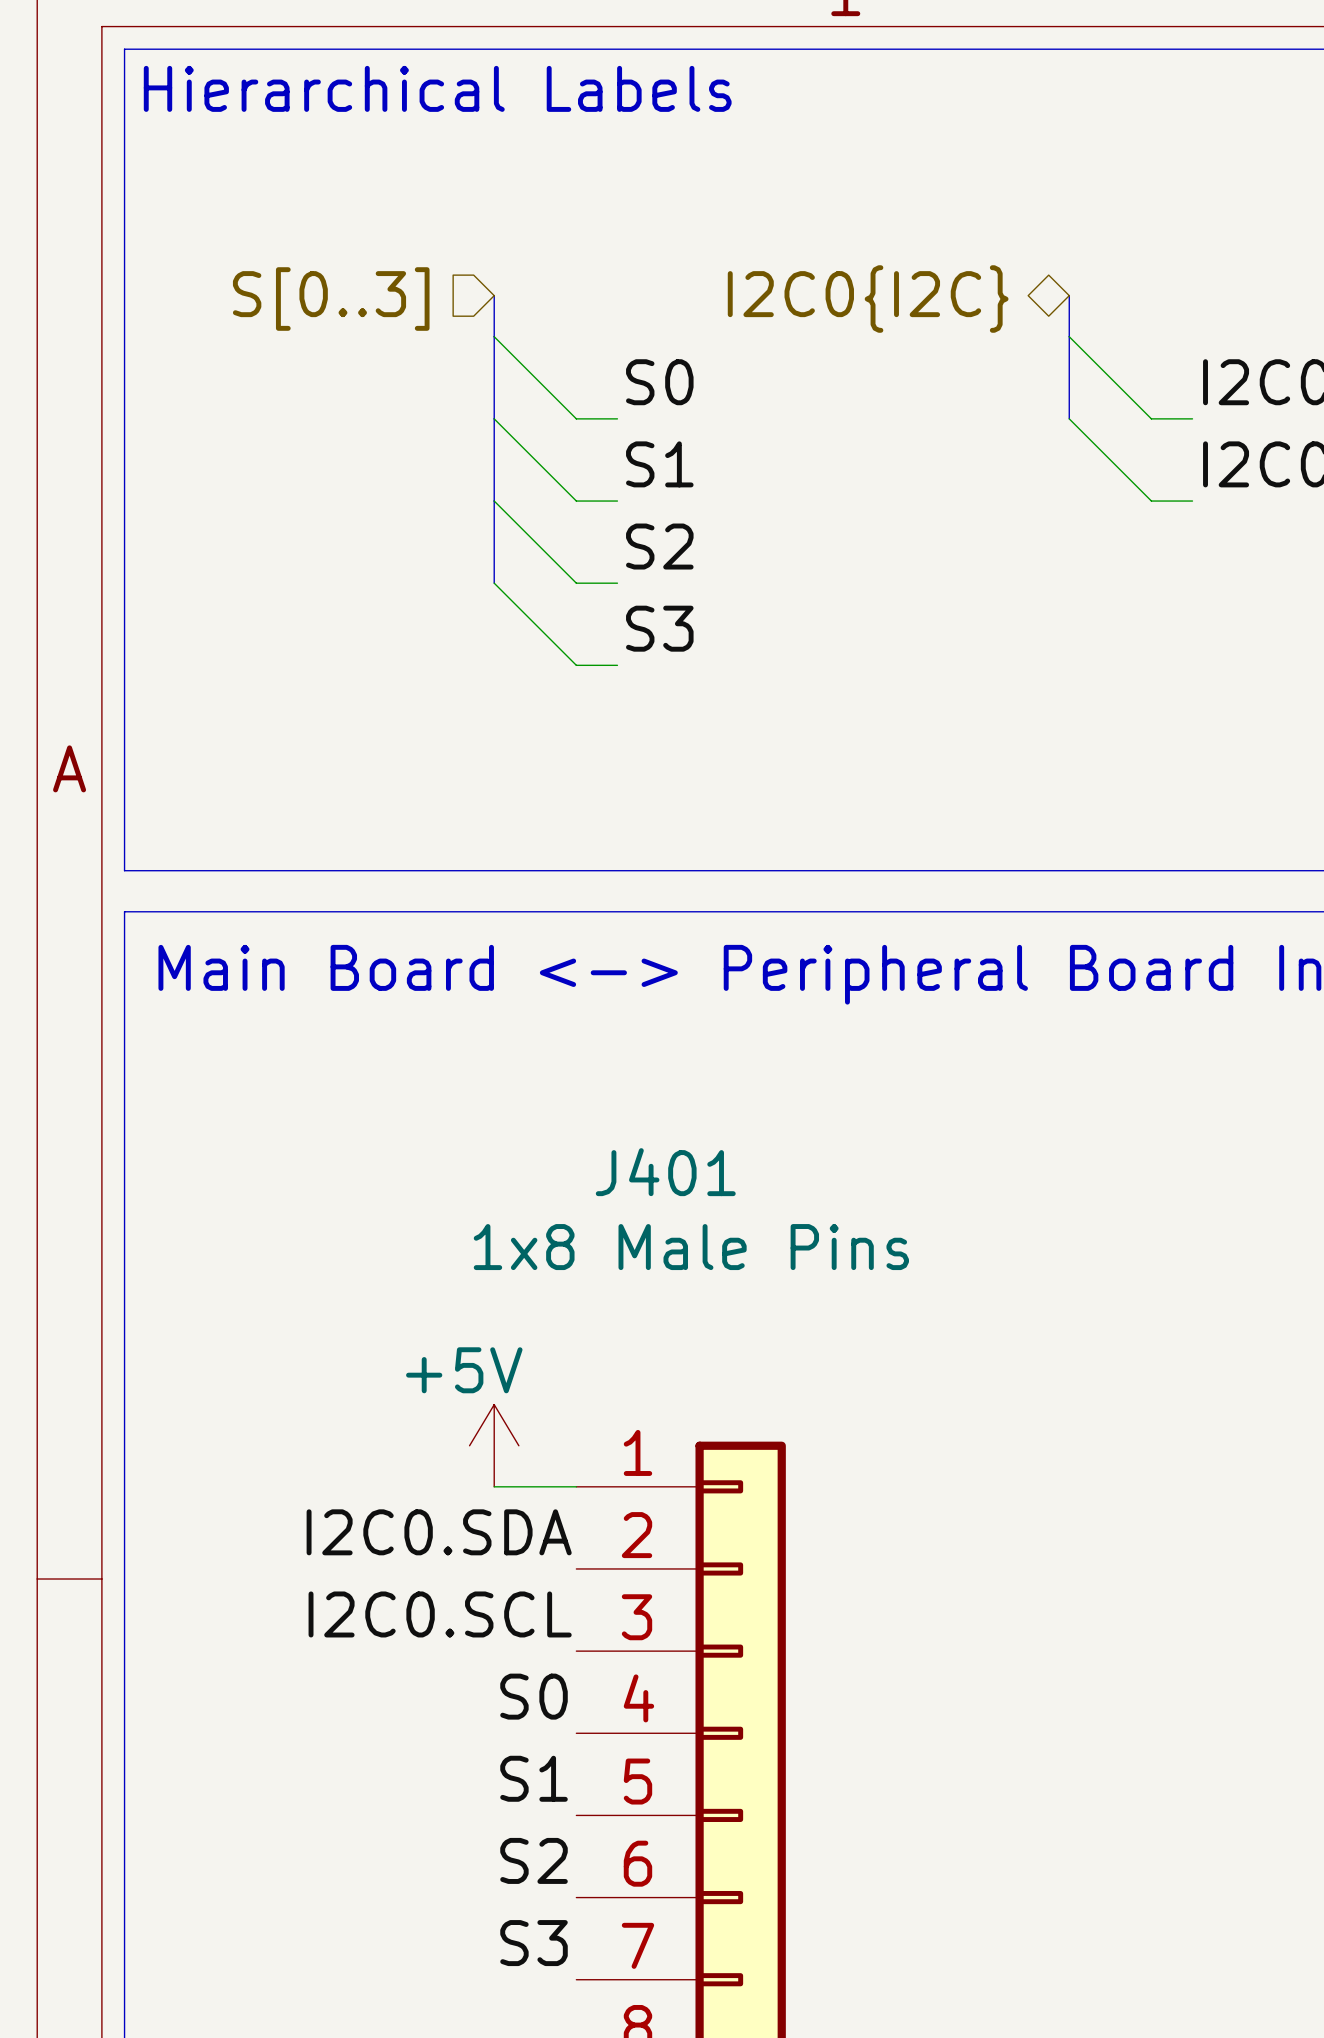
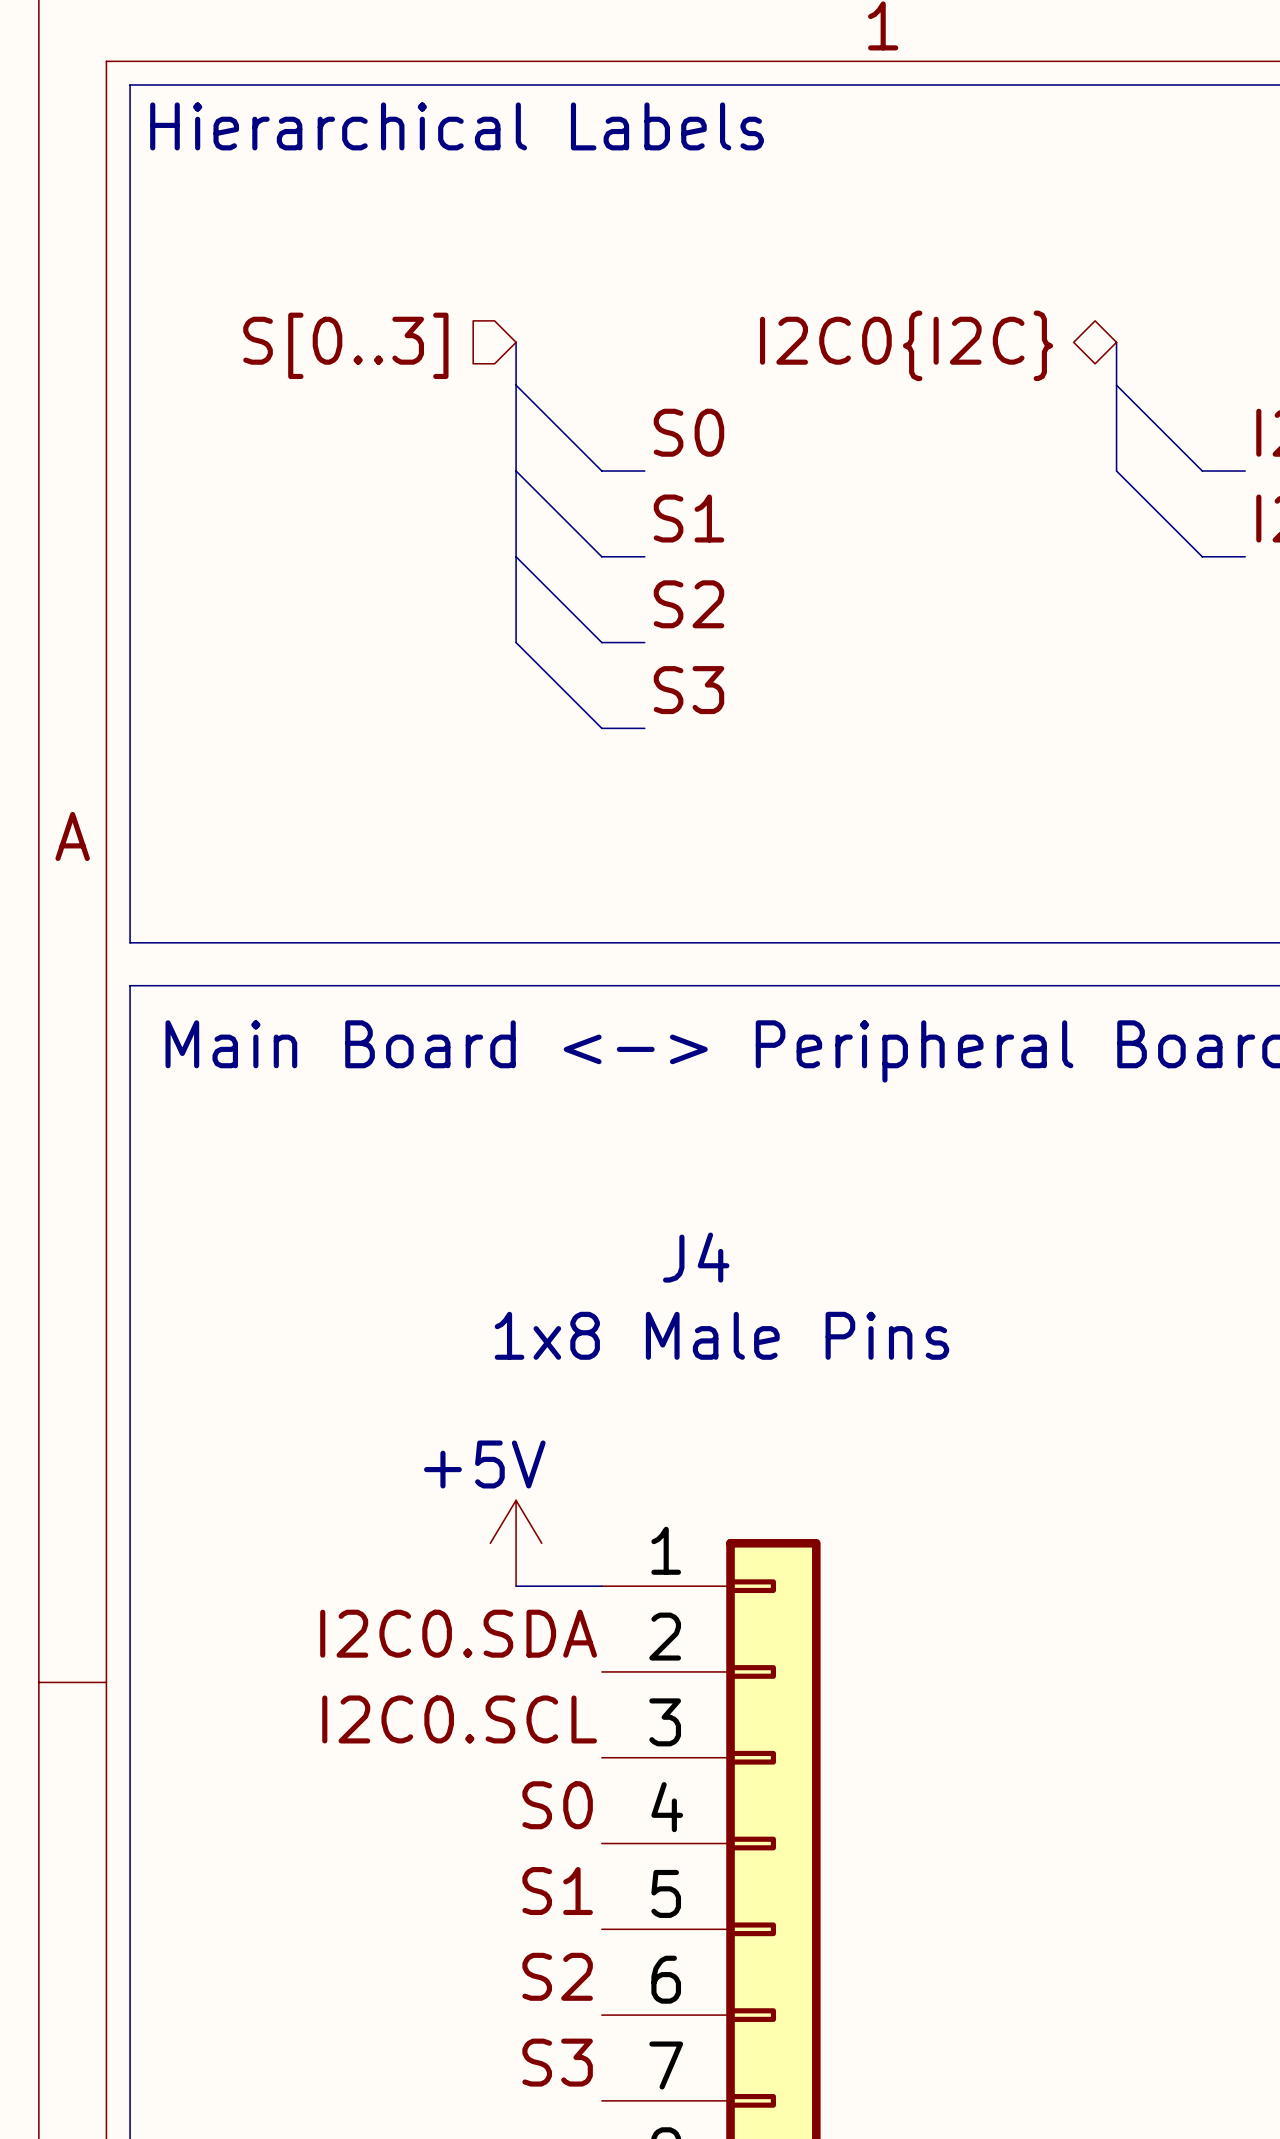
J401 name: J401 (665, 1172) -> J4 (696, 1257)

